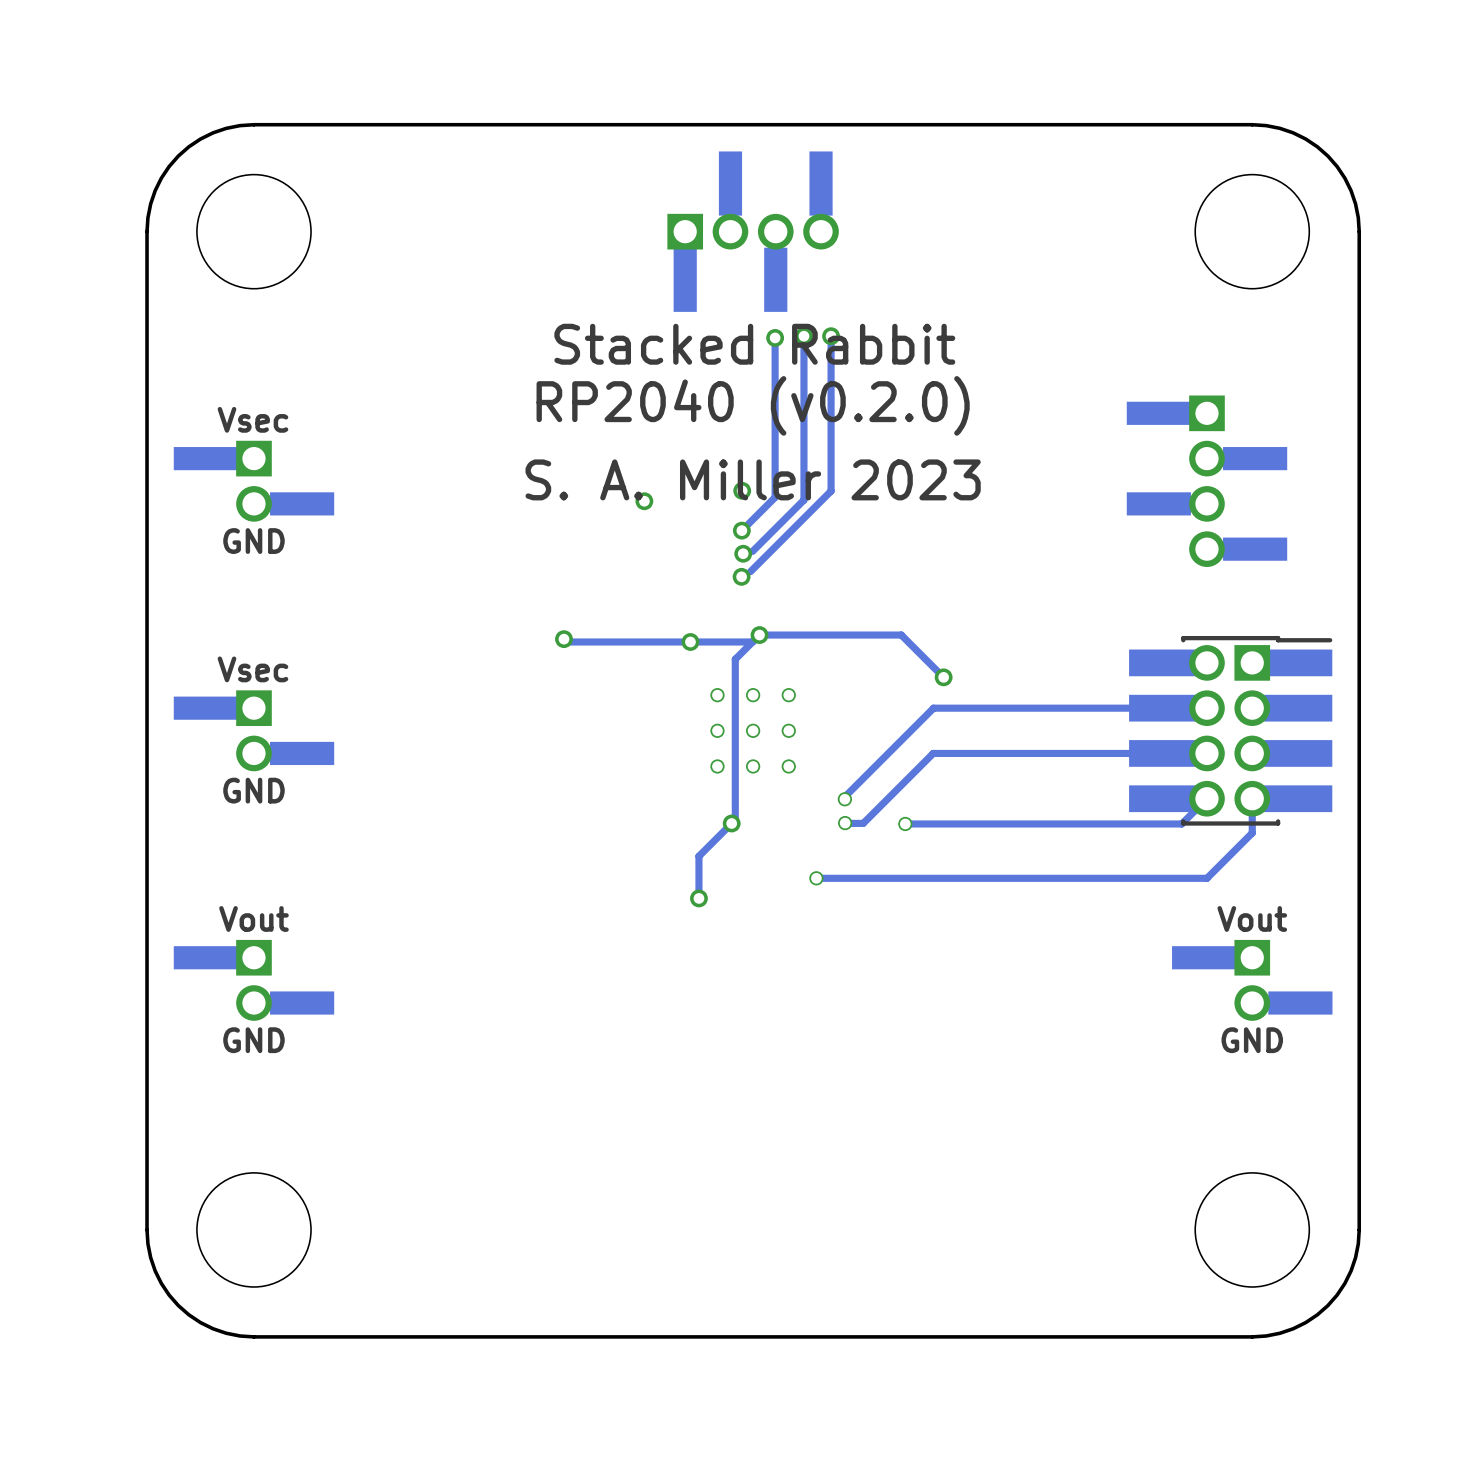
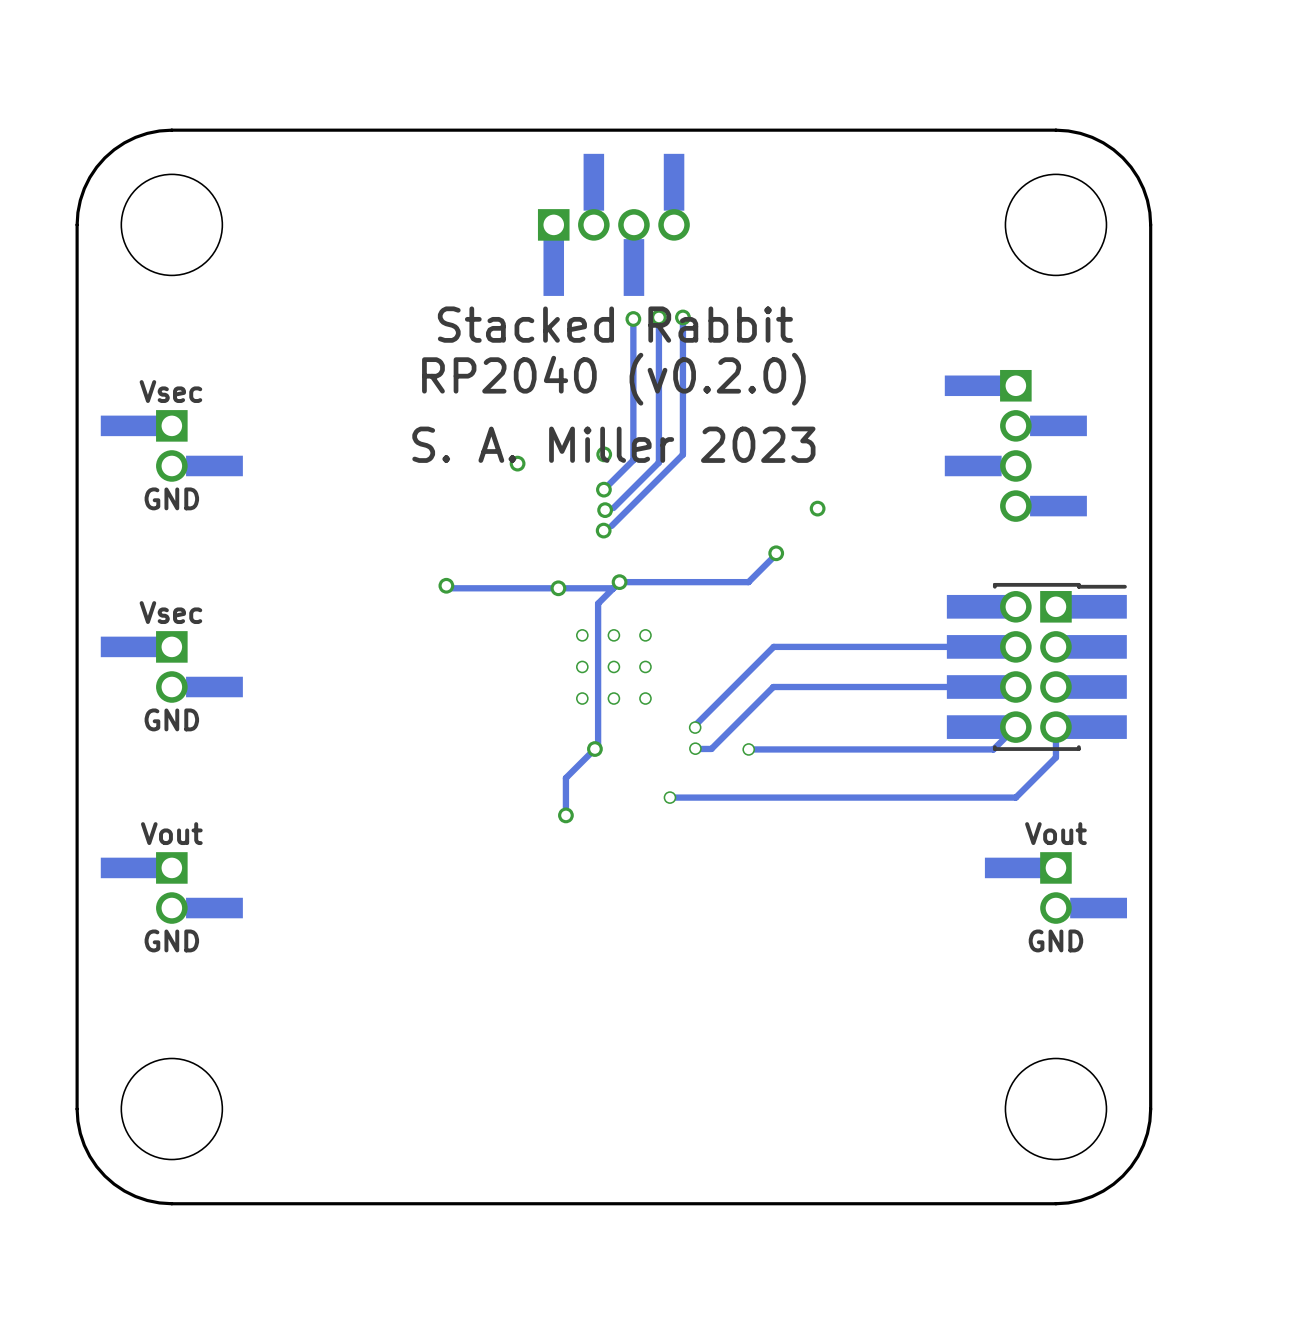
via: none -> (817, 508)
via: none -> (776, 553)
track: (901, 635) (943, 677) -> (745, 582) (748, 582) (776, 554)
via: (943, 677) -> none

